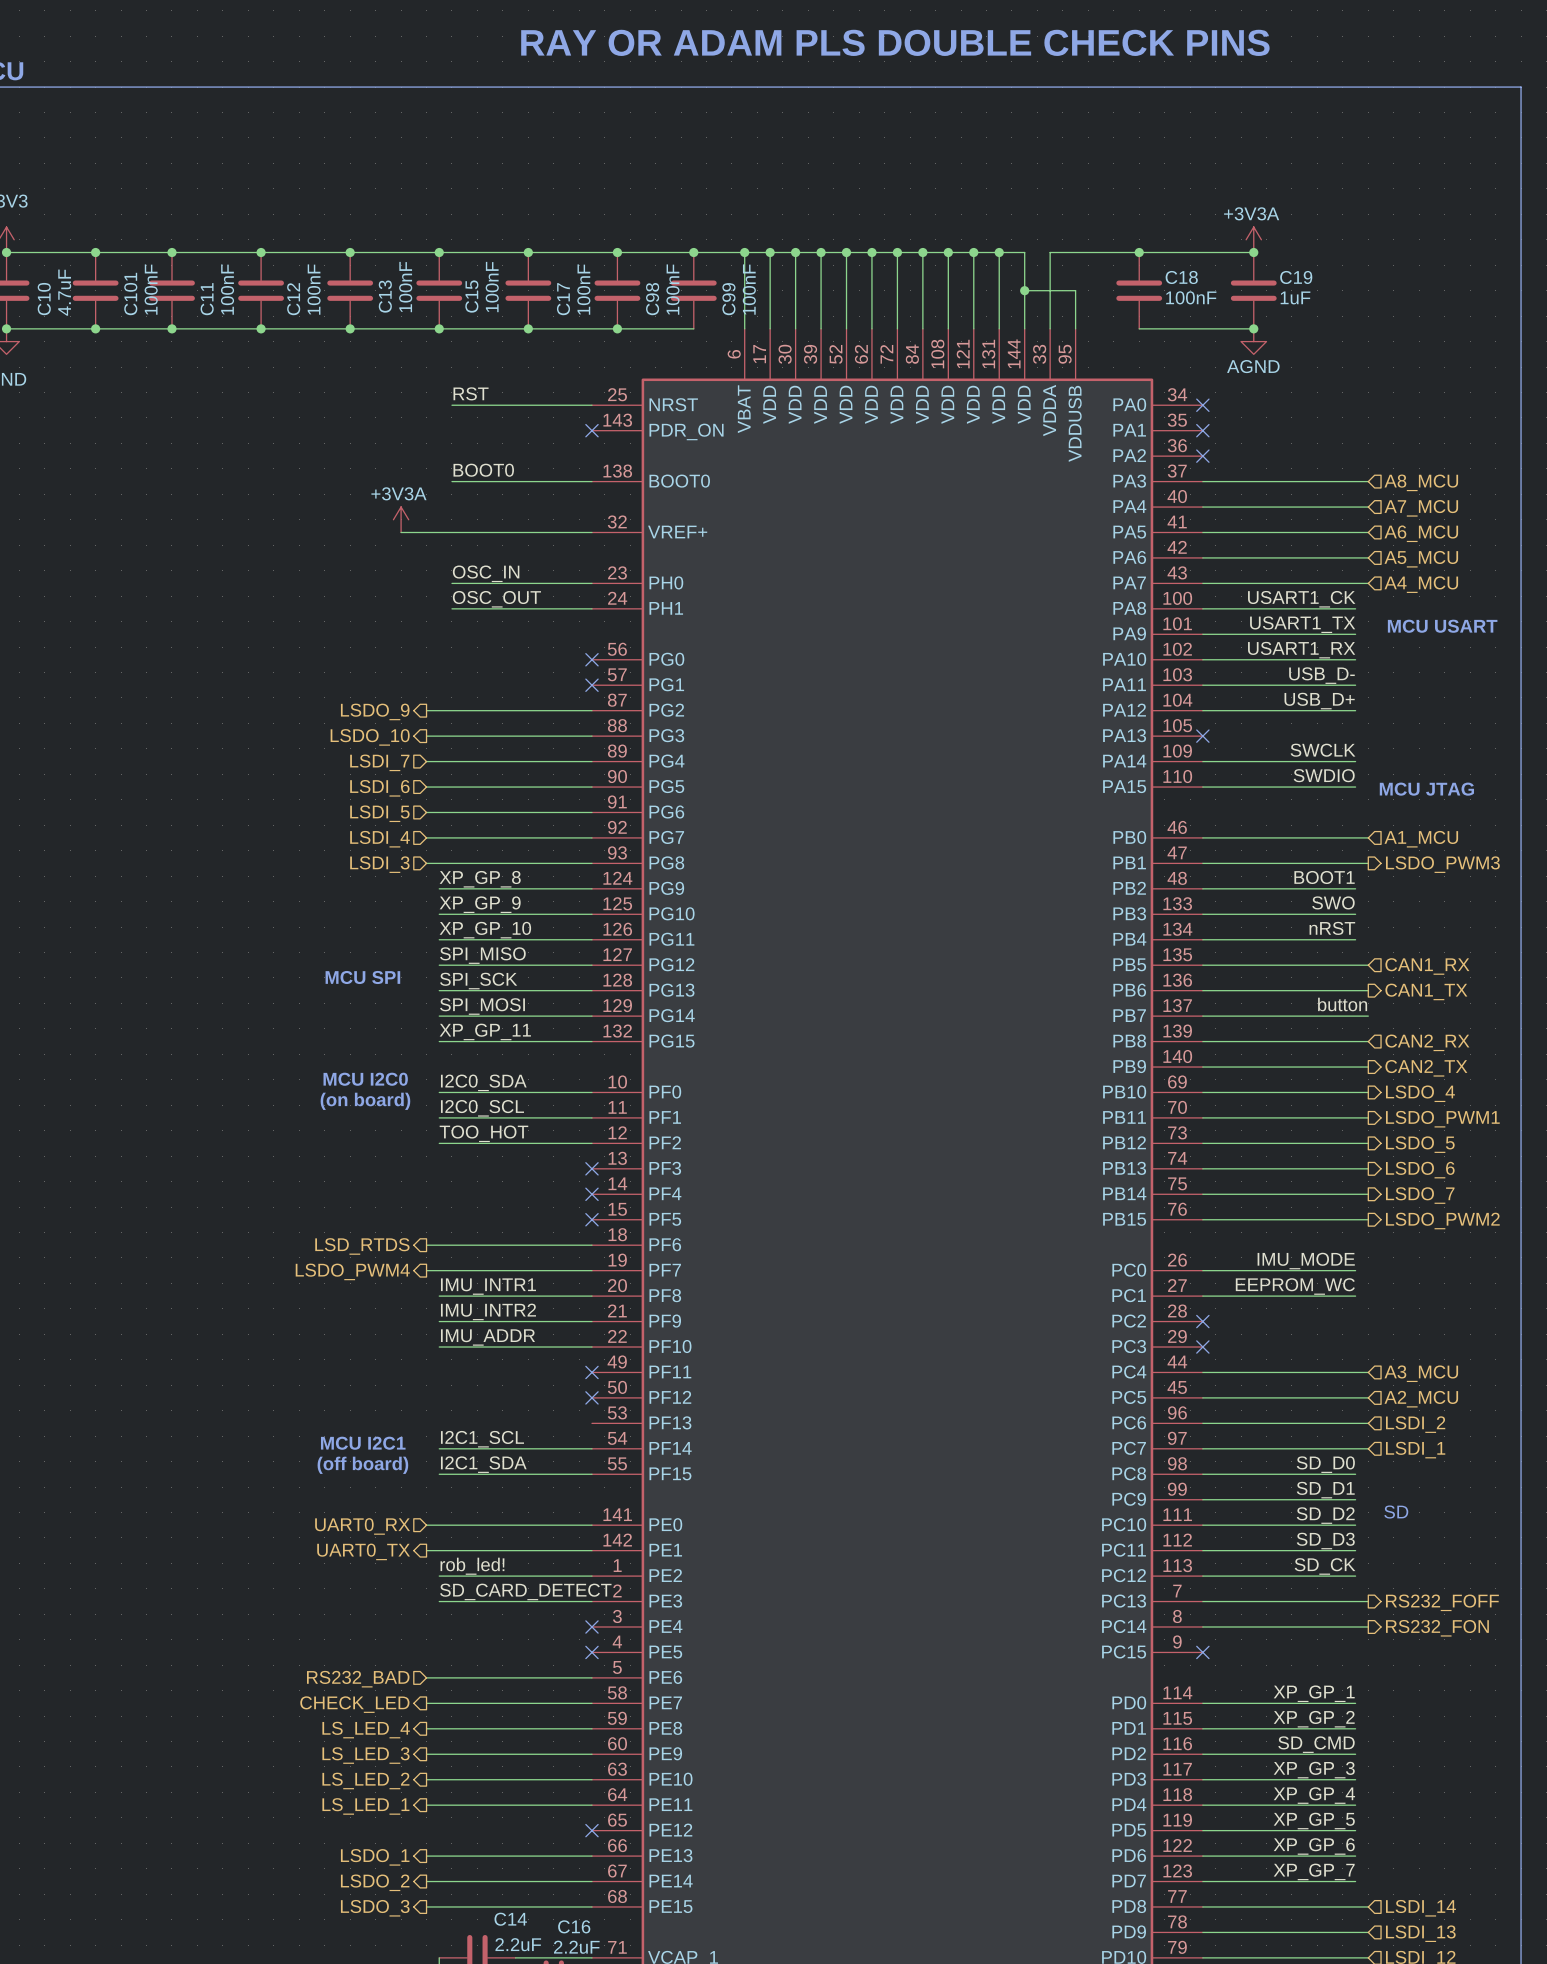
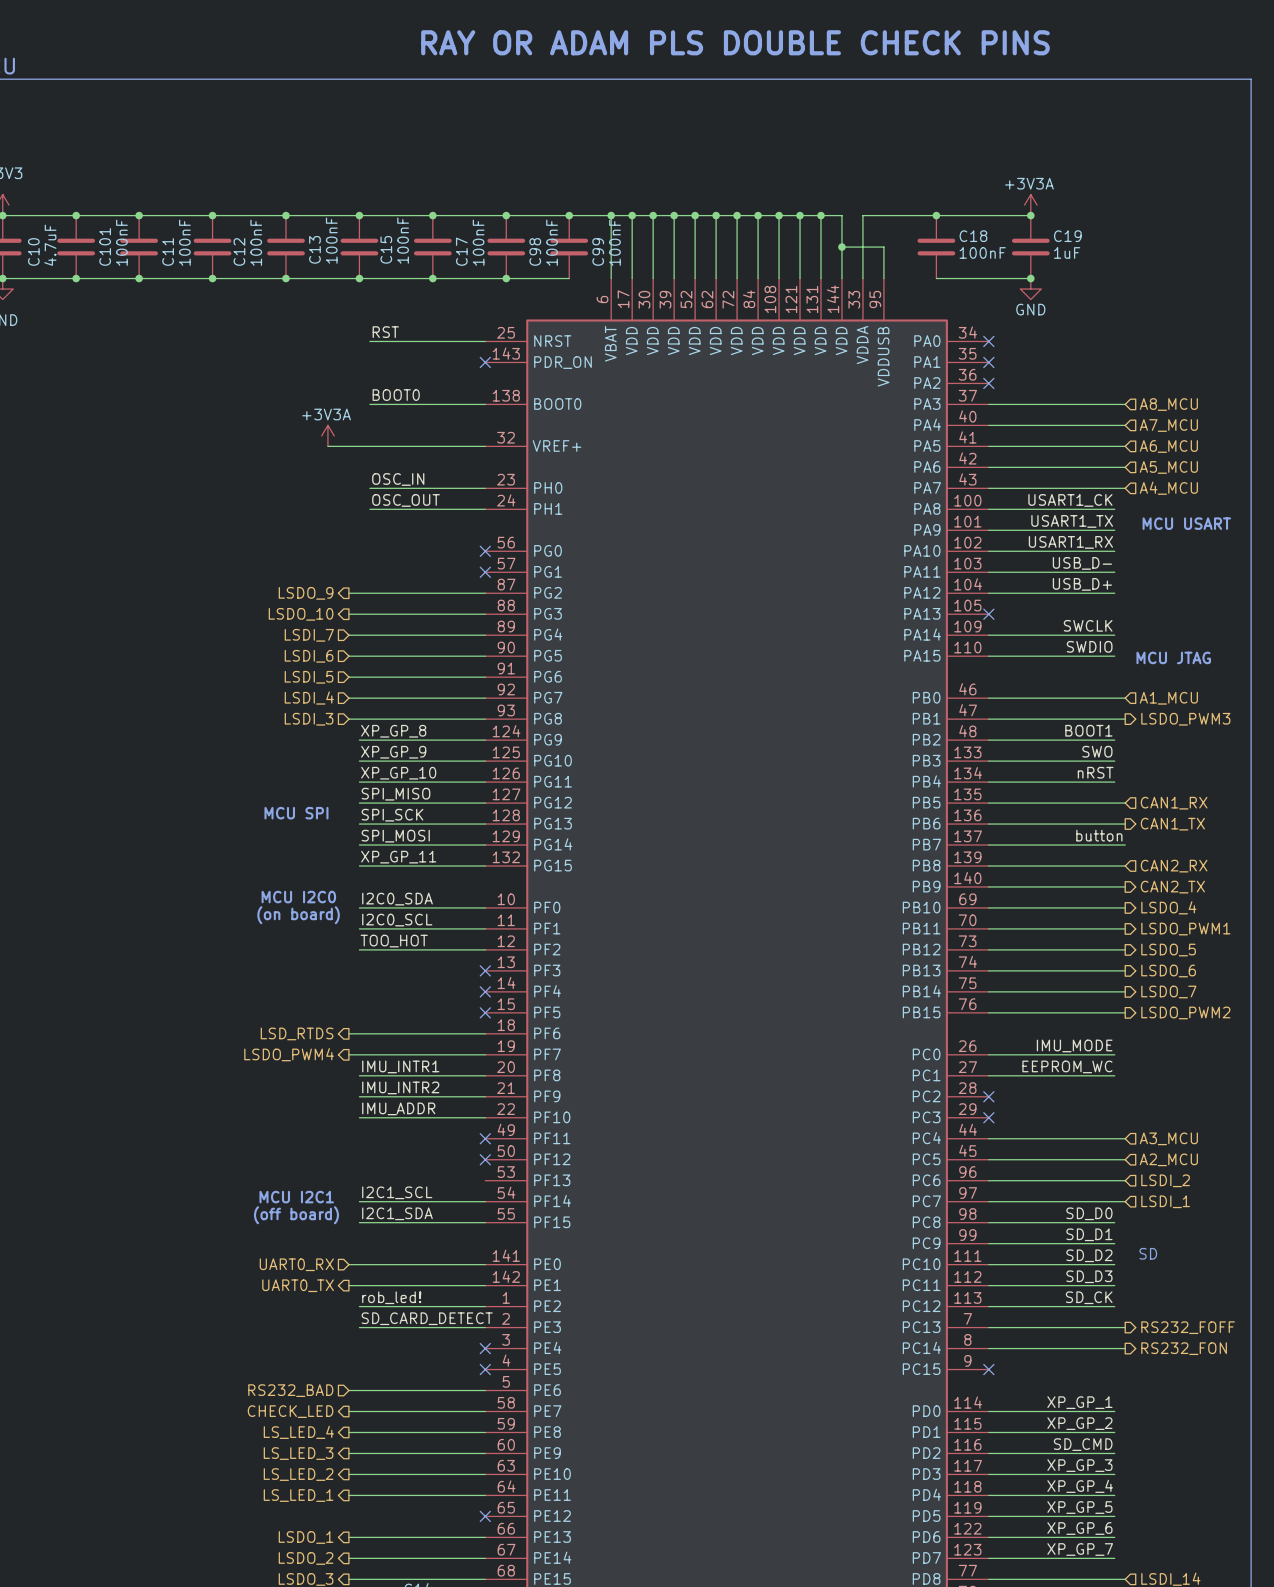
power symbol: AGND (1253, 341) -> GND (1030, 289)

